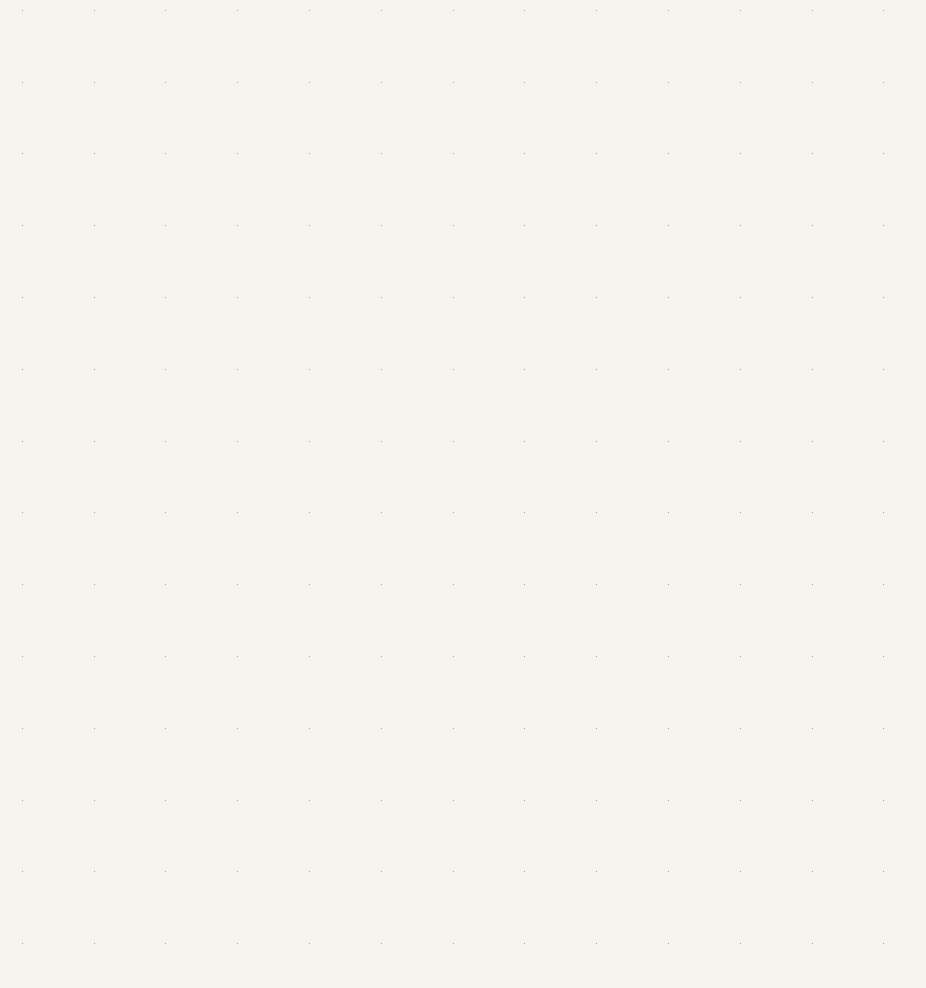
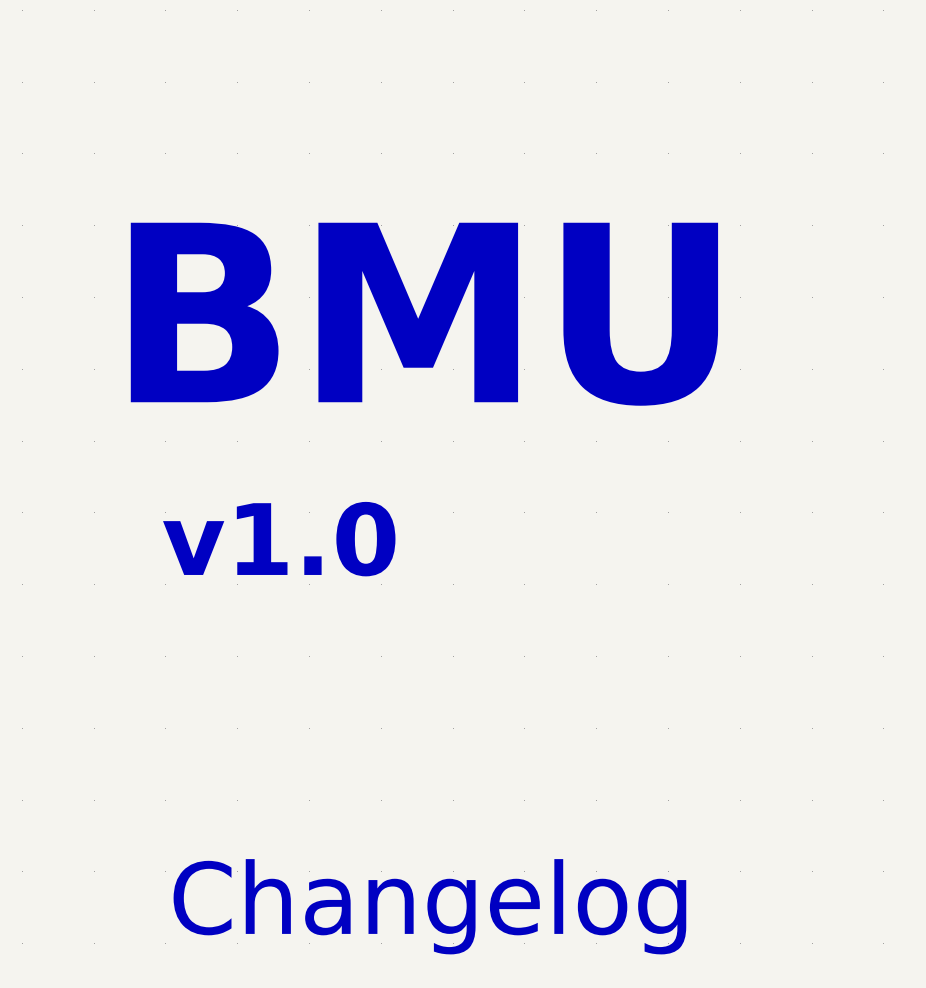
text: none -> BMU (424, 314)
text: none -> v1.0 (279, 539)
text: none -> Changelog (429, 906)

